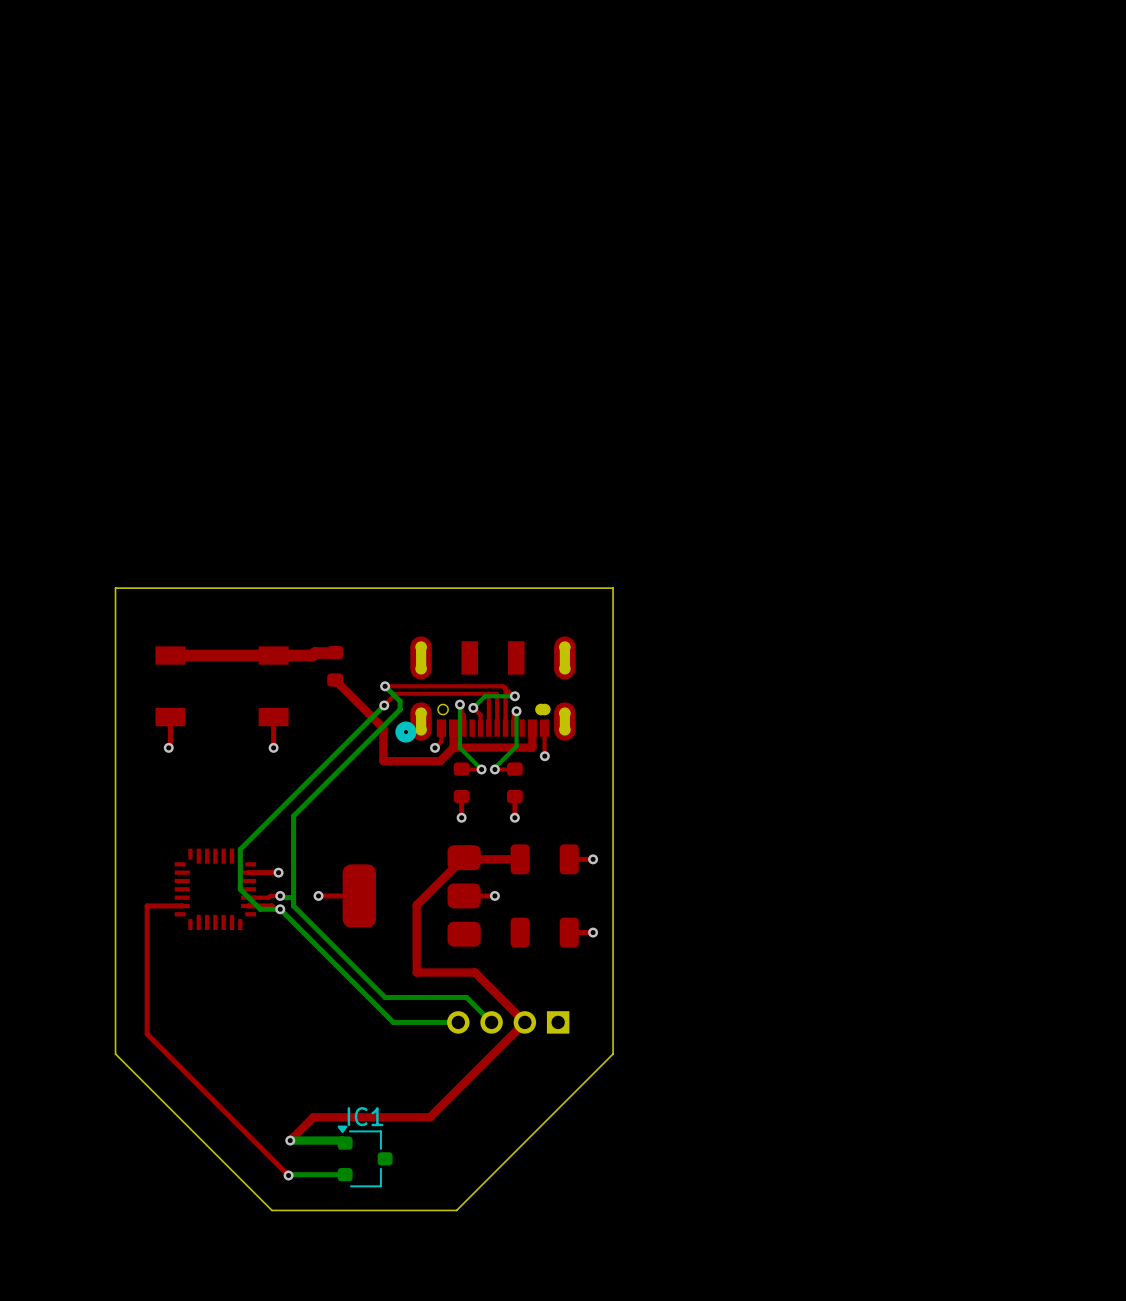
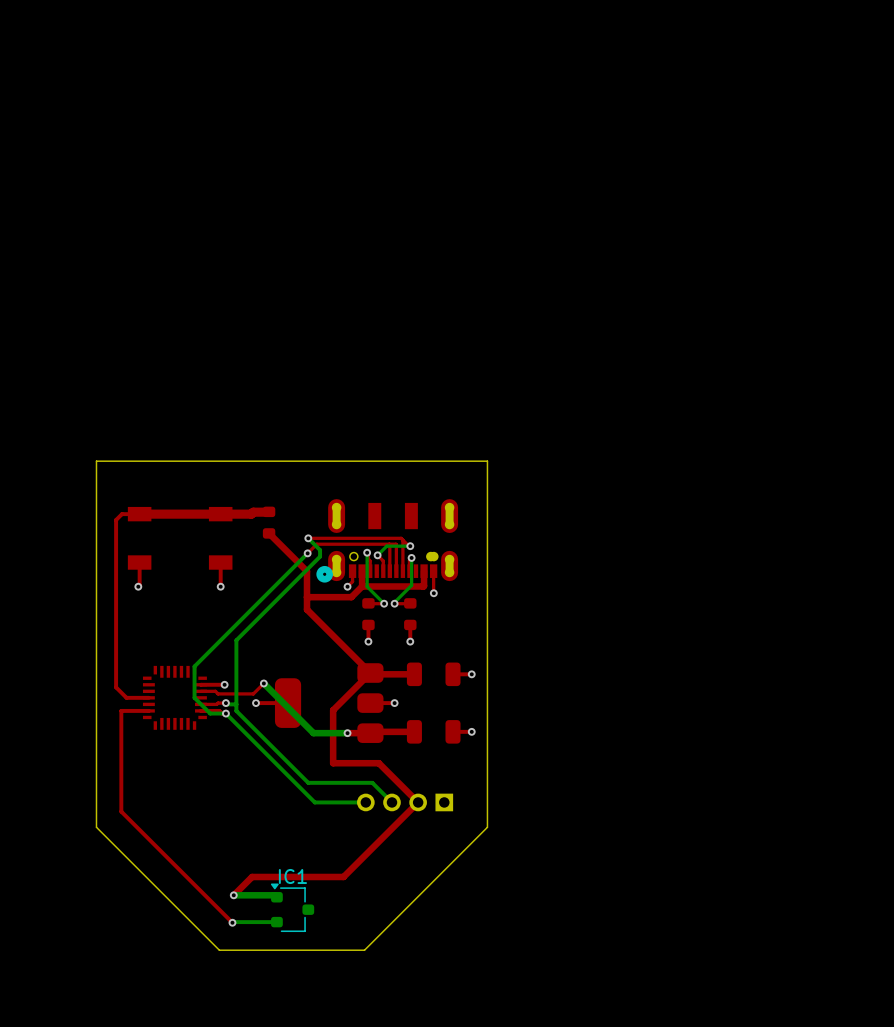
top track: none -> (139, 514) (121, 514) (116, 520) (116, 687) (126, 697) (148, 697)
top track: none -> (307, 597) (307, 609) (370, 673)
top track: none -> (263, 683) (253, 693) (218, 693) (215, 691) (200, 691)
bottom track: none -> (263, 683) (313, 733) (347, 733)
via: none -> (263, 683)
top track: none -> (414, 731) (347, 733)
via: none -> (347, 733)

